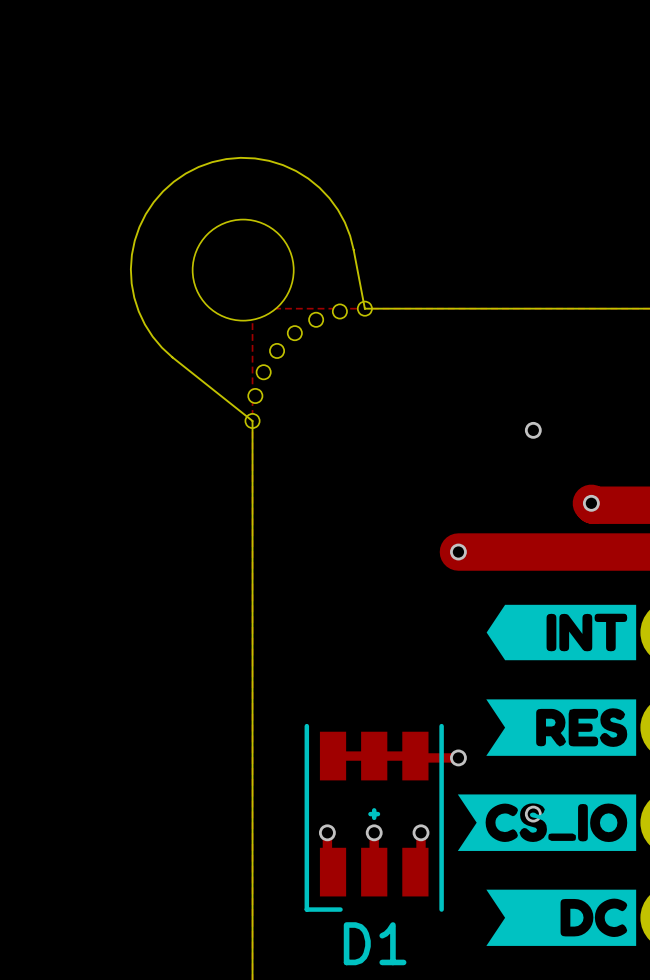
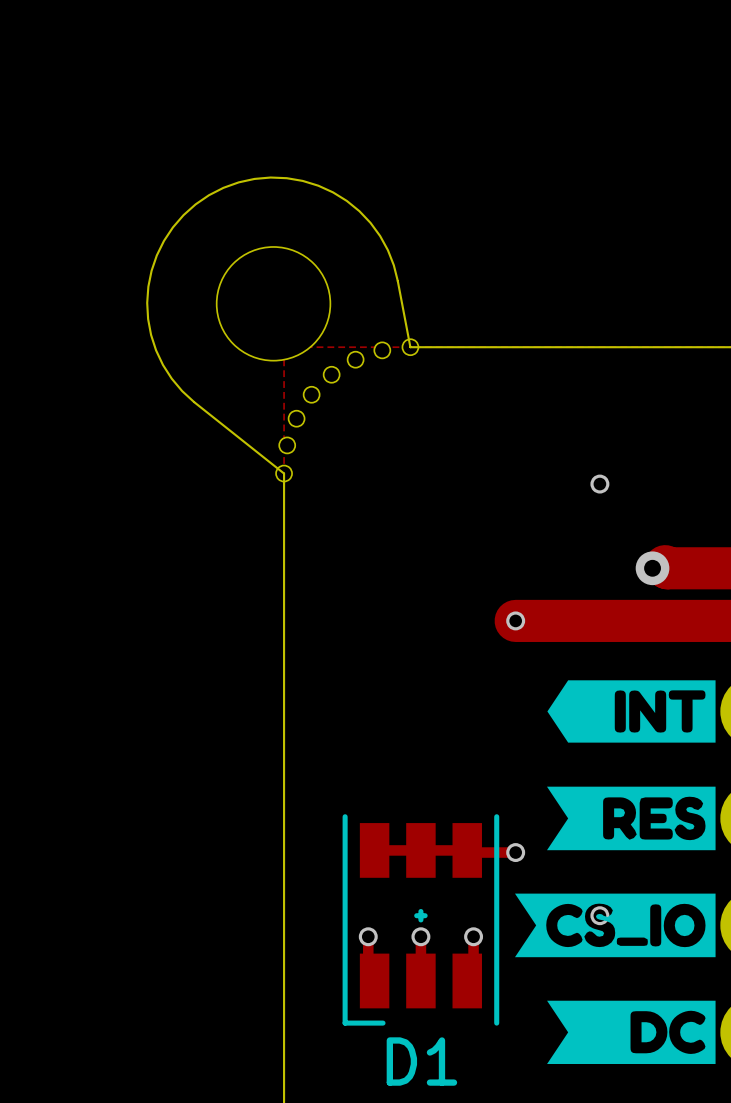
via size: [582, 494, 600, 512] -> [635, 551, 670, 586]

